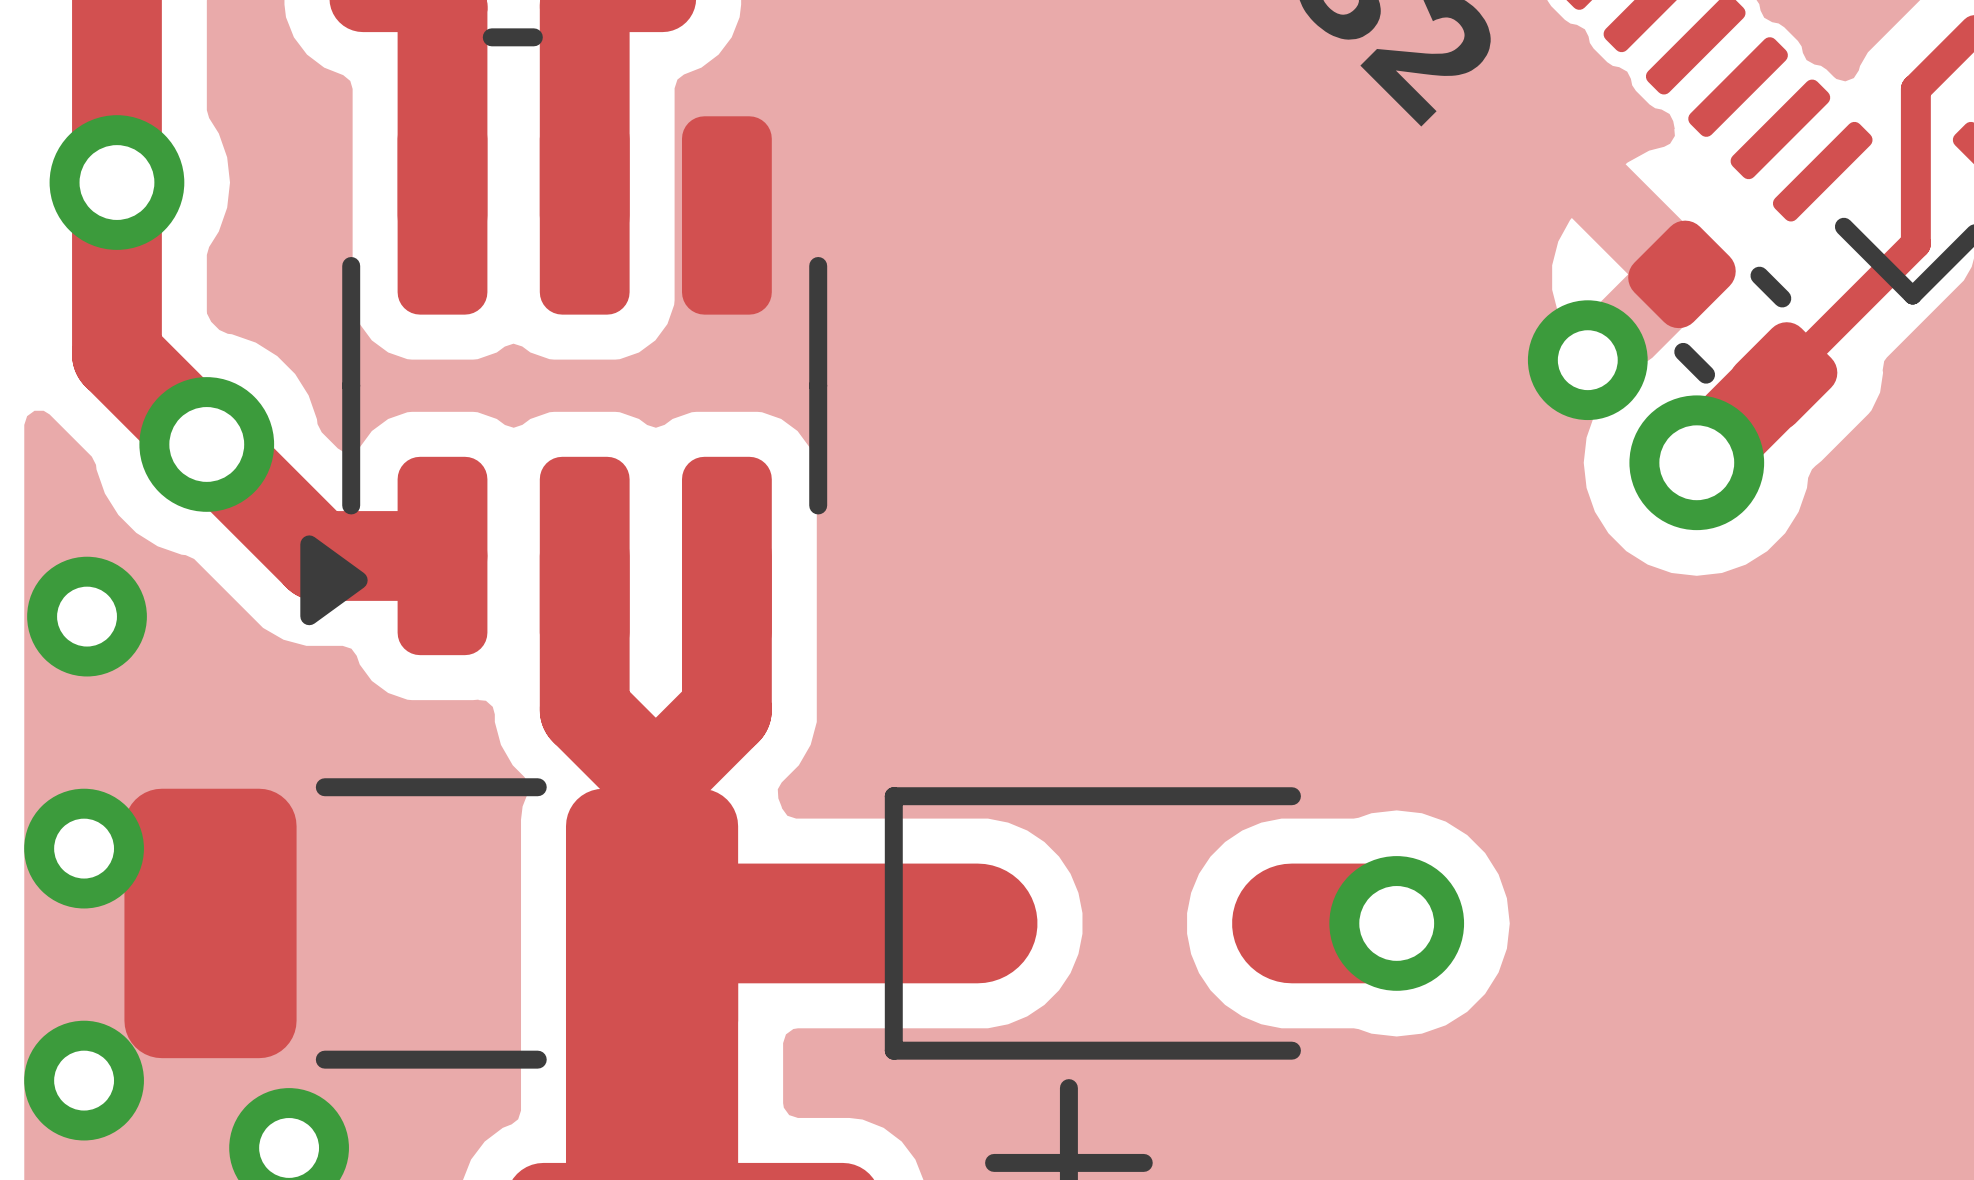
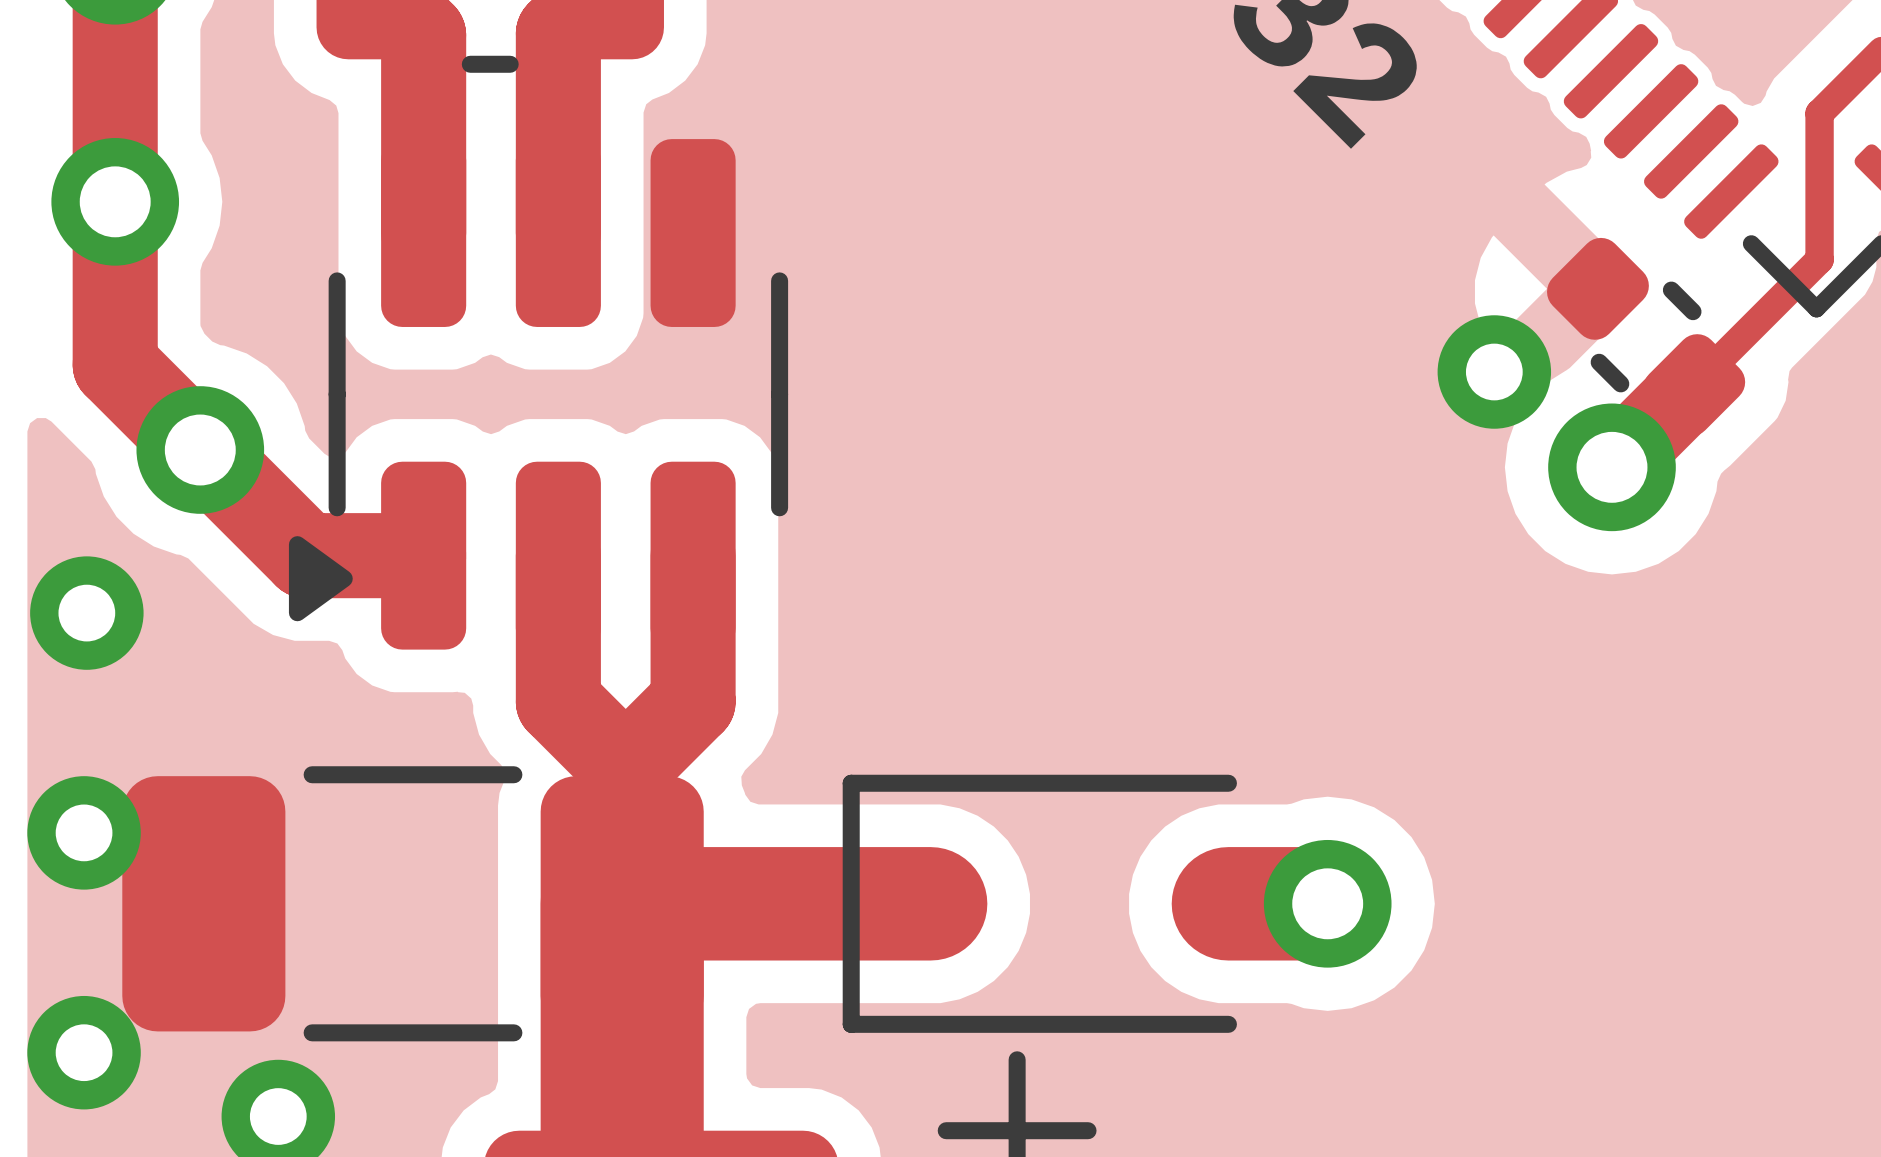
via position: (1587, 360) -> (1494, 372)

